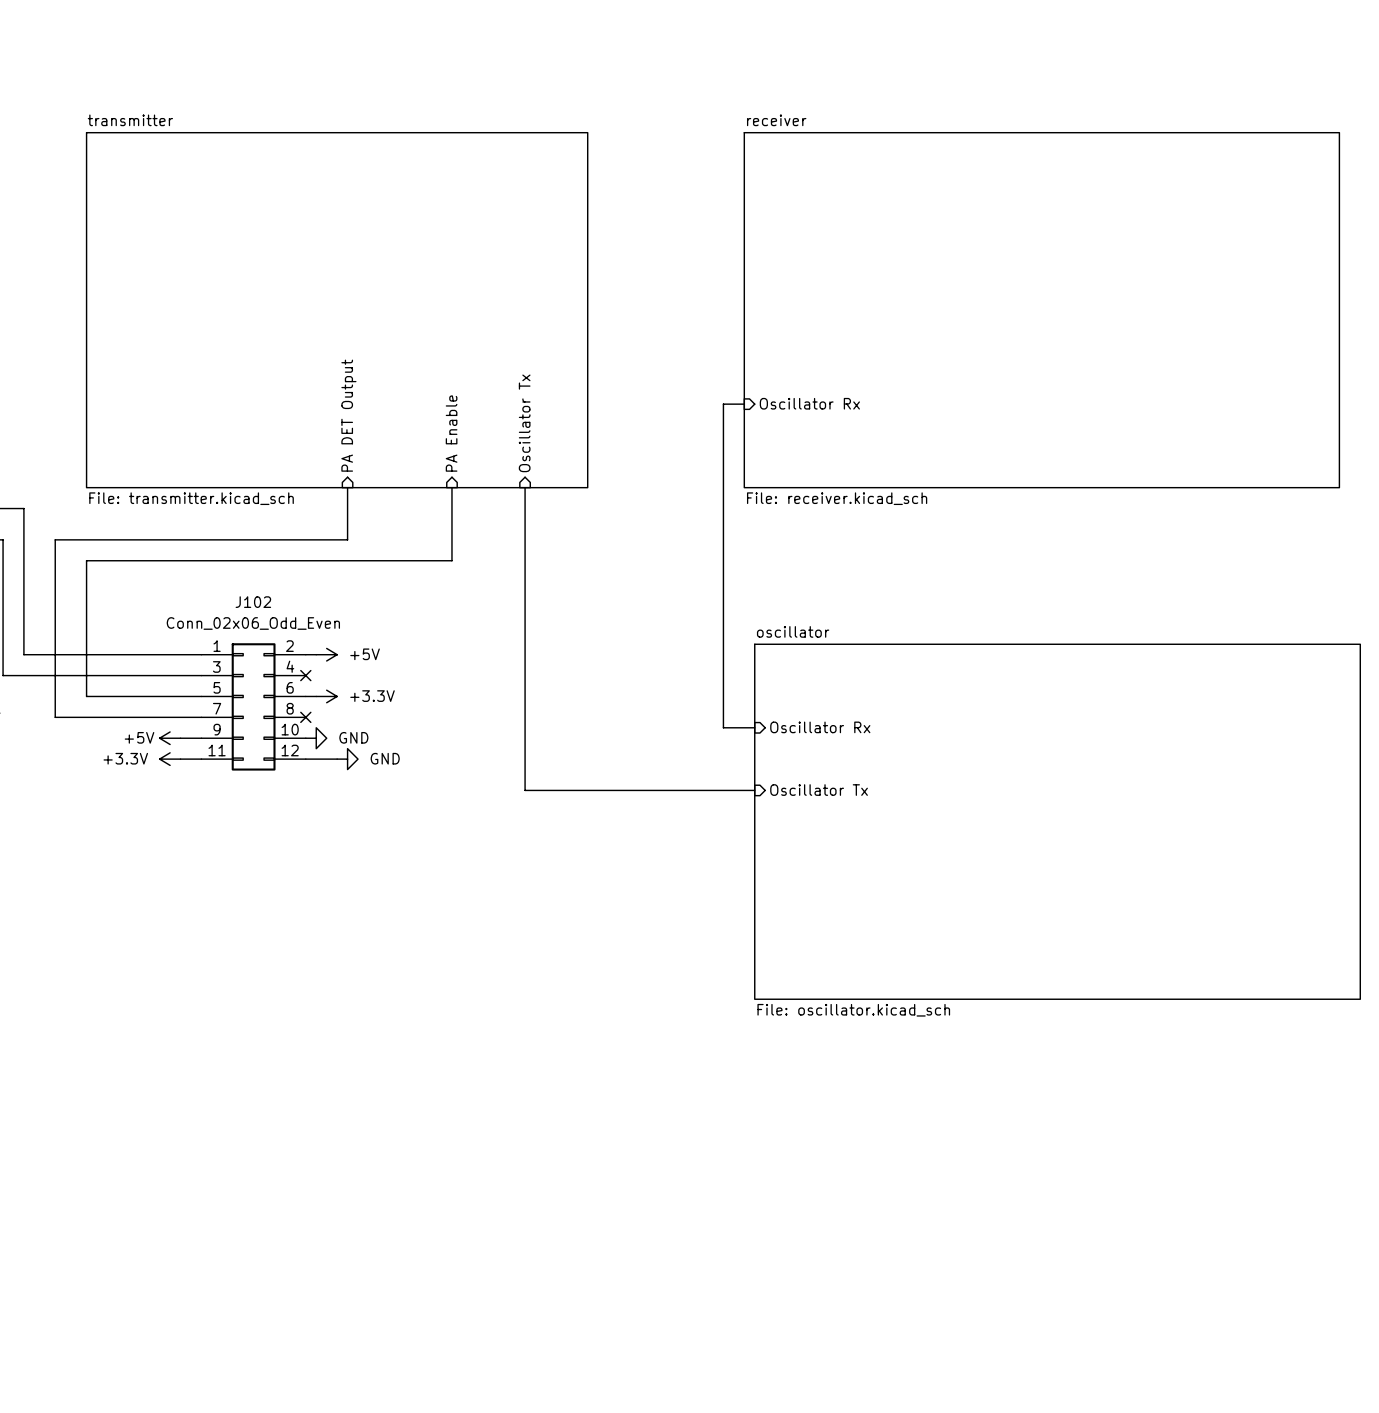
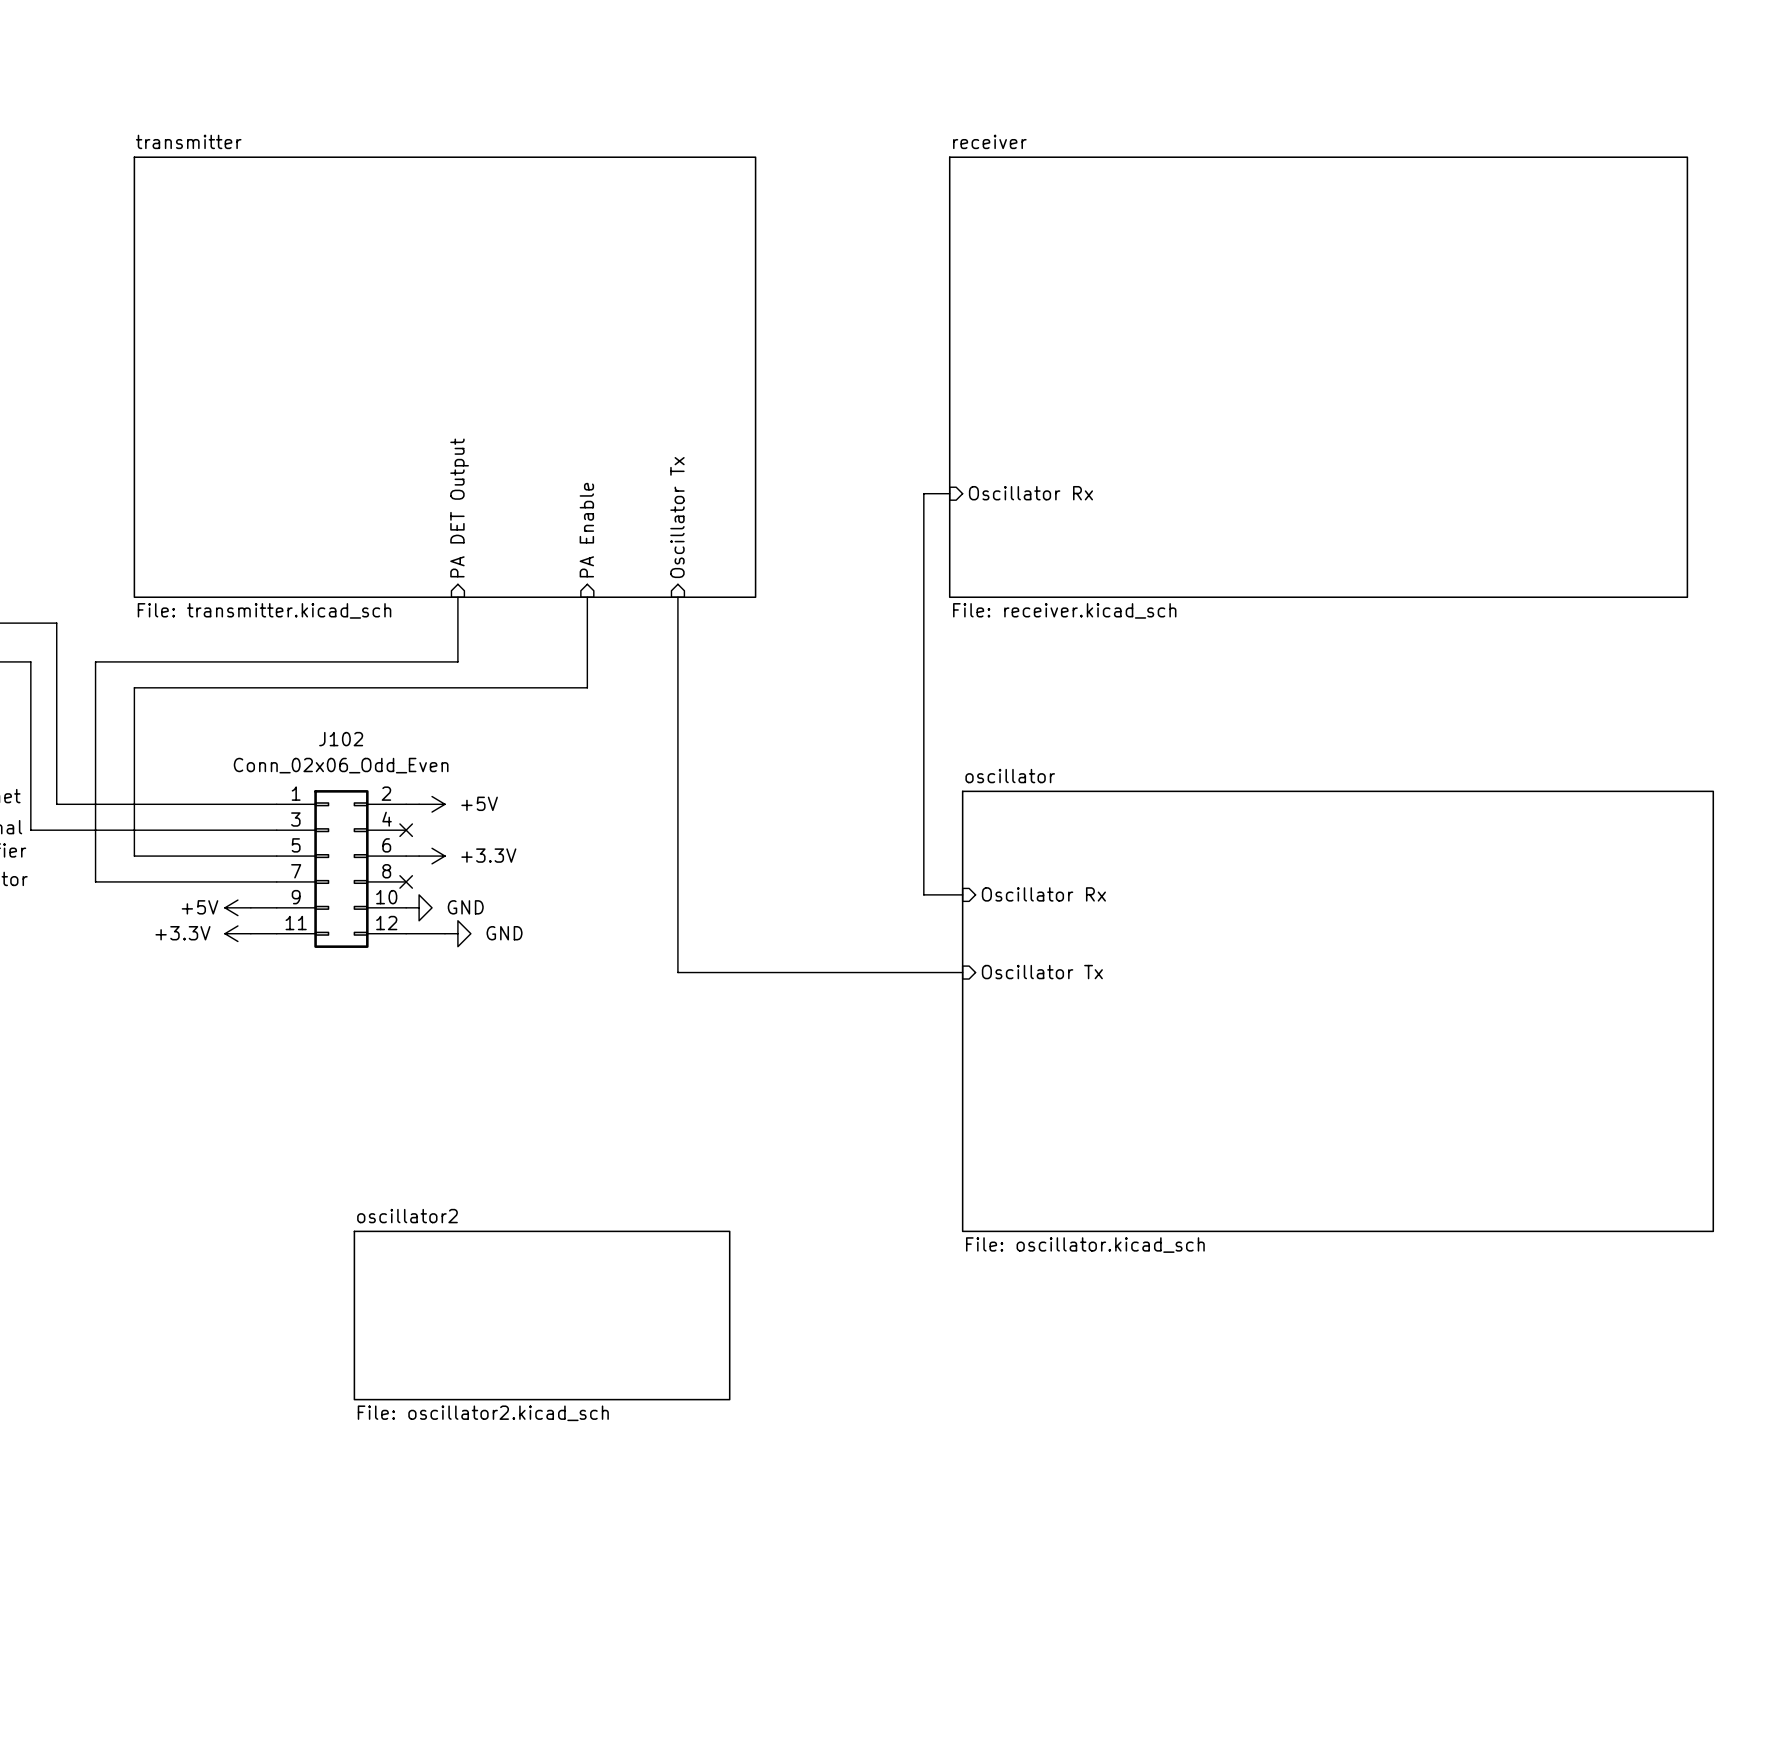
sheet oscillator2: none -> File: oscillator2.kicad_sch (542, 1315)

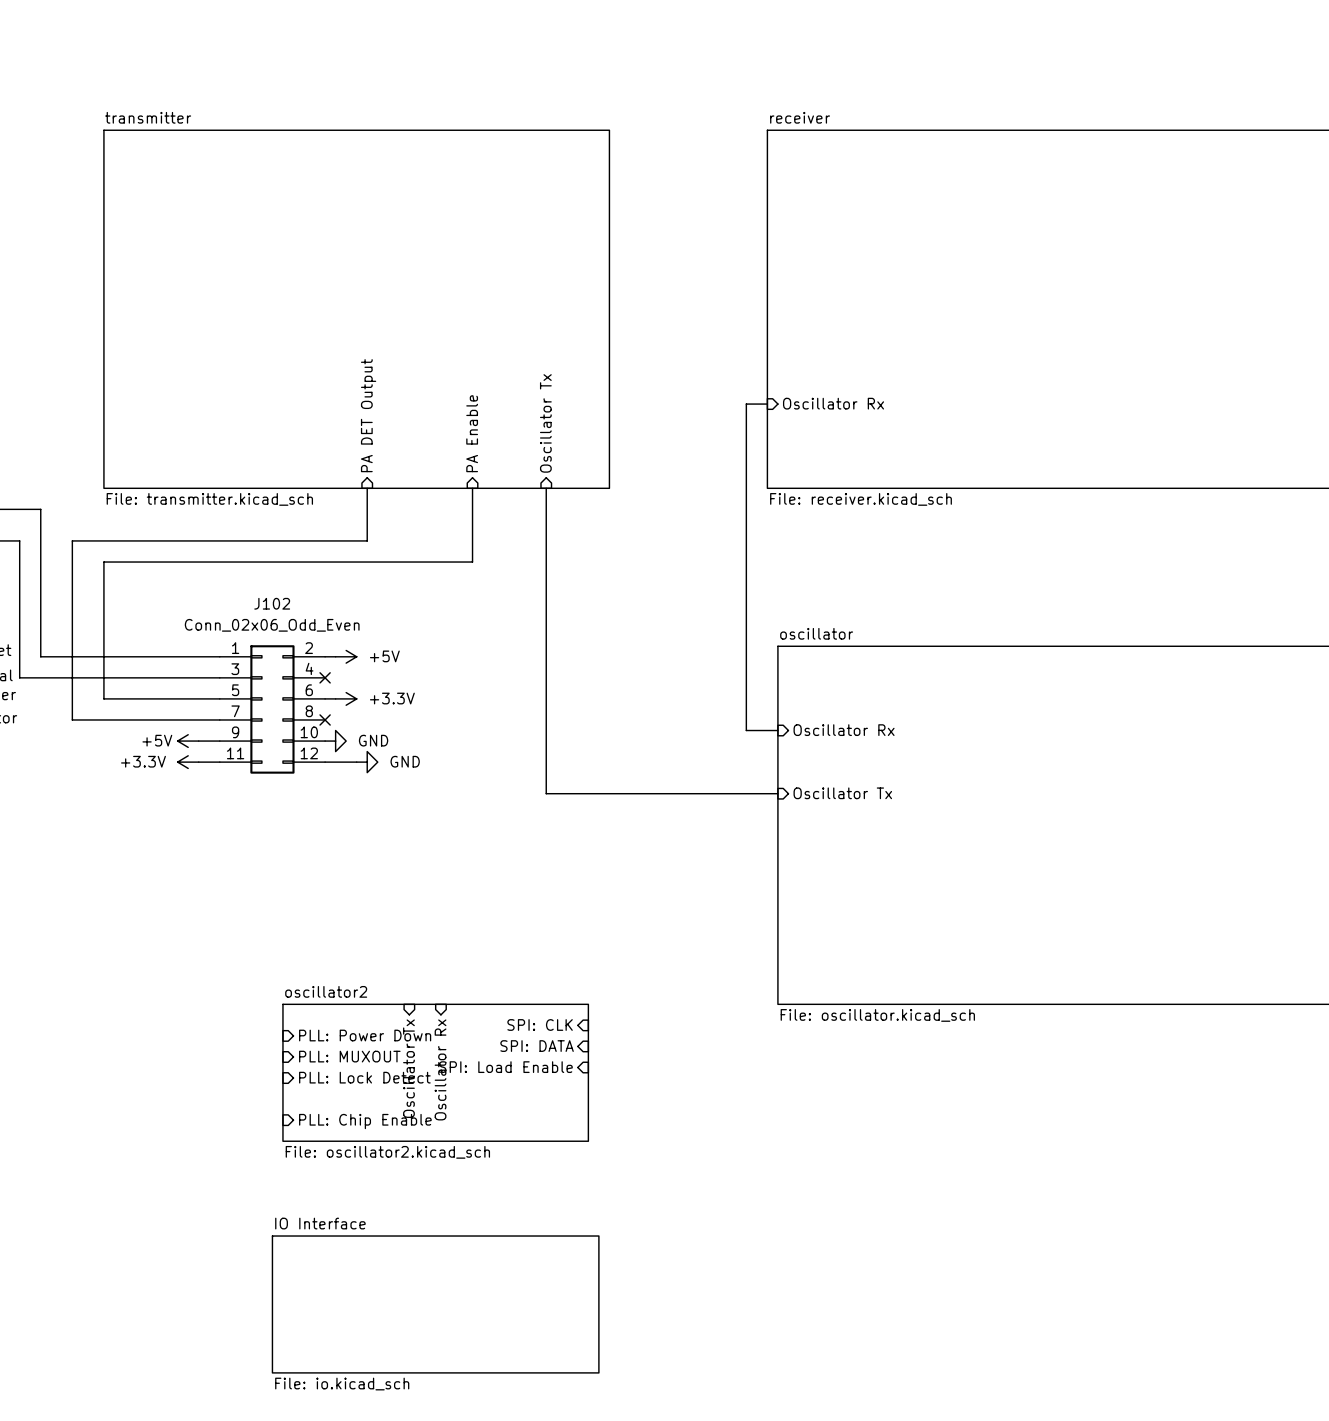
sheet pin: none -> SPI: CLK (540, 1024)
sheet pin: none -> PLL: Power Down (365, 1035)
sheet pin: none -> SPI: DATA (537, 1046)
sheet pin: none -> PLL: MUXOUT (349, 1056)
sheet pin: none -> SPI: Load Enable (505, 1067)
sheet pin: none -> Oscillator Tx (408, 1068)
sheet pin: none -> Oscillator Rx (440, 1069)
sheet pin: none -> PLL: Lock Detect (364, 1077)
sheet pin: none -> PLL: Chip Enable (365, 1121)
sheet IO Interface: none -> File: io.kicad_sch (435, 1304)

